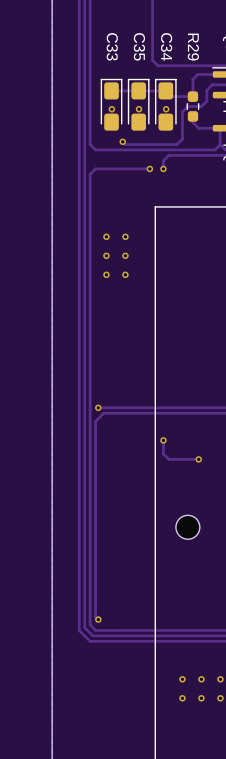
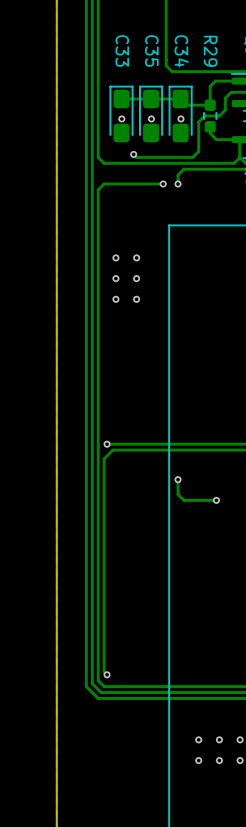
part: (187, 527) -> none

